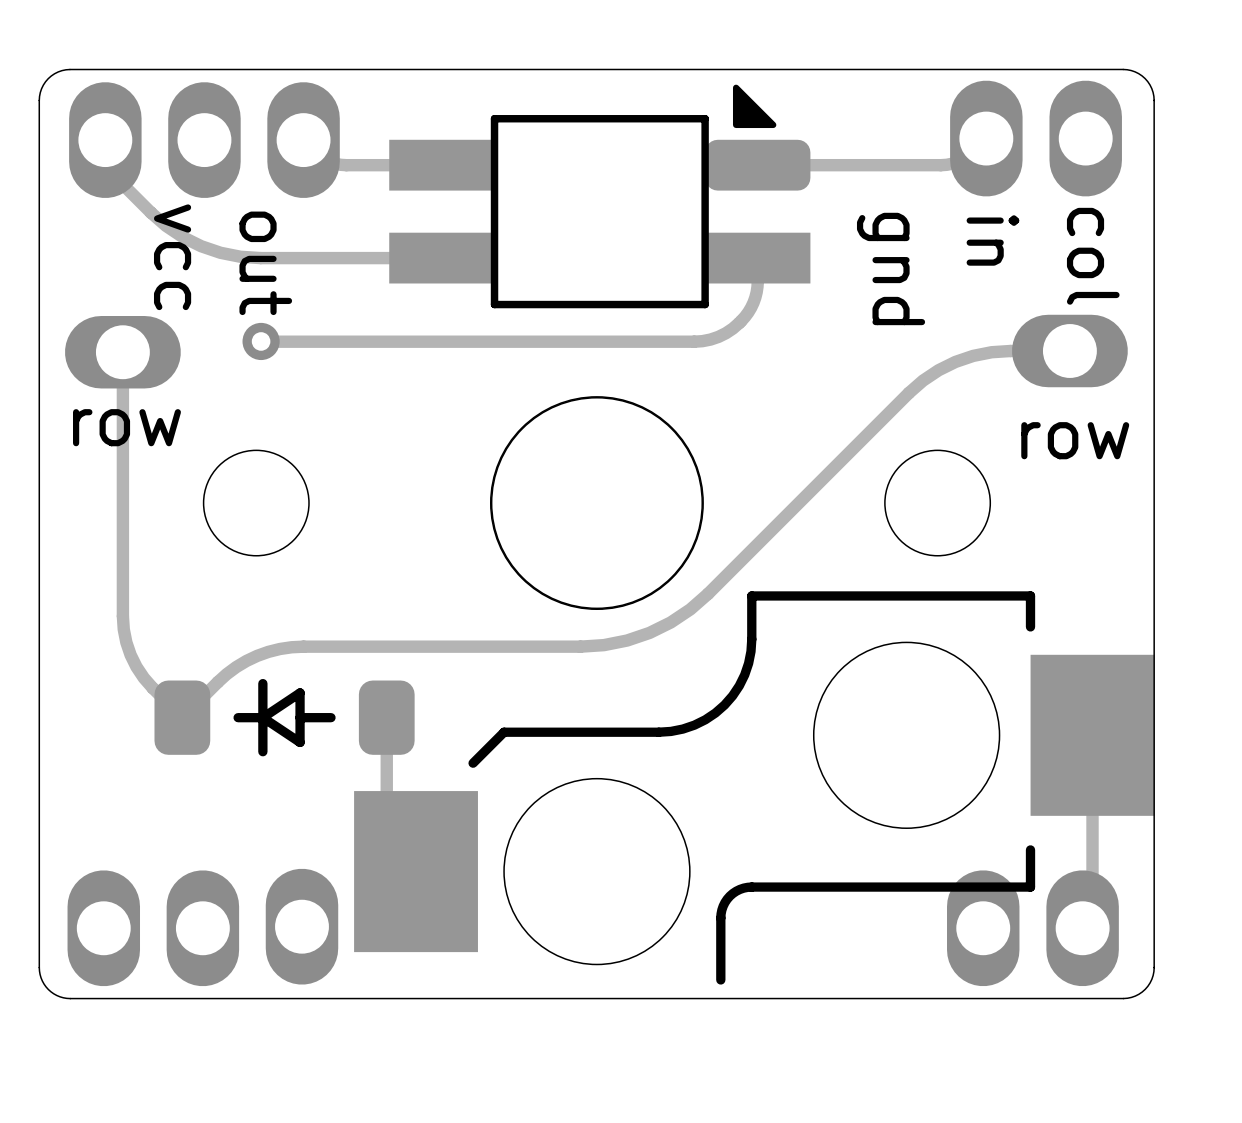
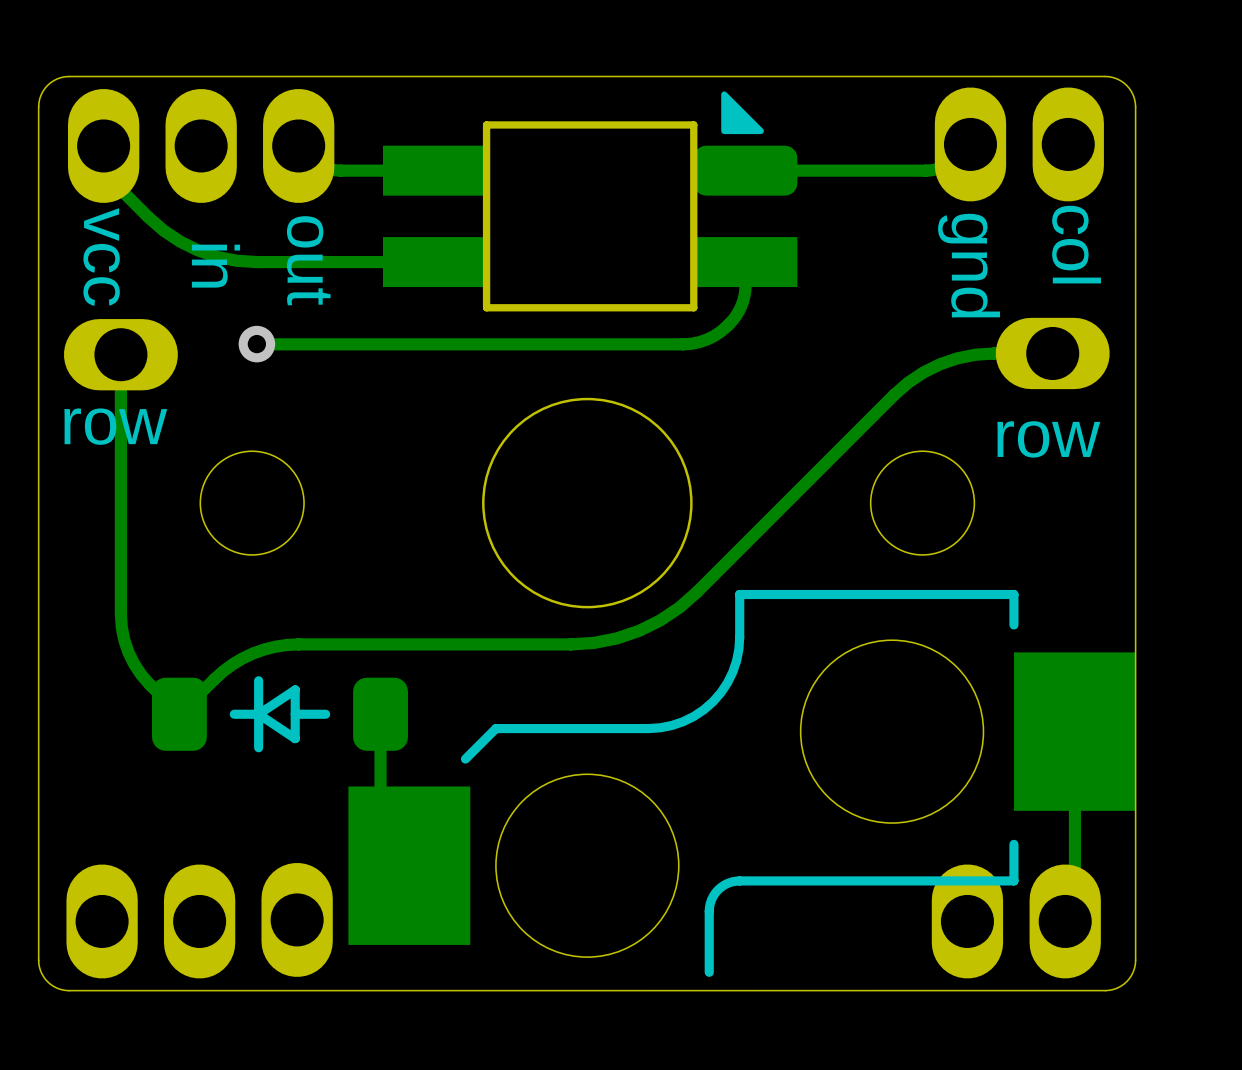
text: in (992, 240) -> gnd (969, 265)
text position: vcc (172, 257) -> vcc (101, 256)
text position: out (265, 263) -> out (308, 260)
text: gnd (891, 268) -> none
text: none -> in (216, 266)

